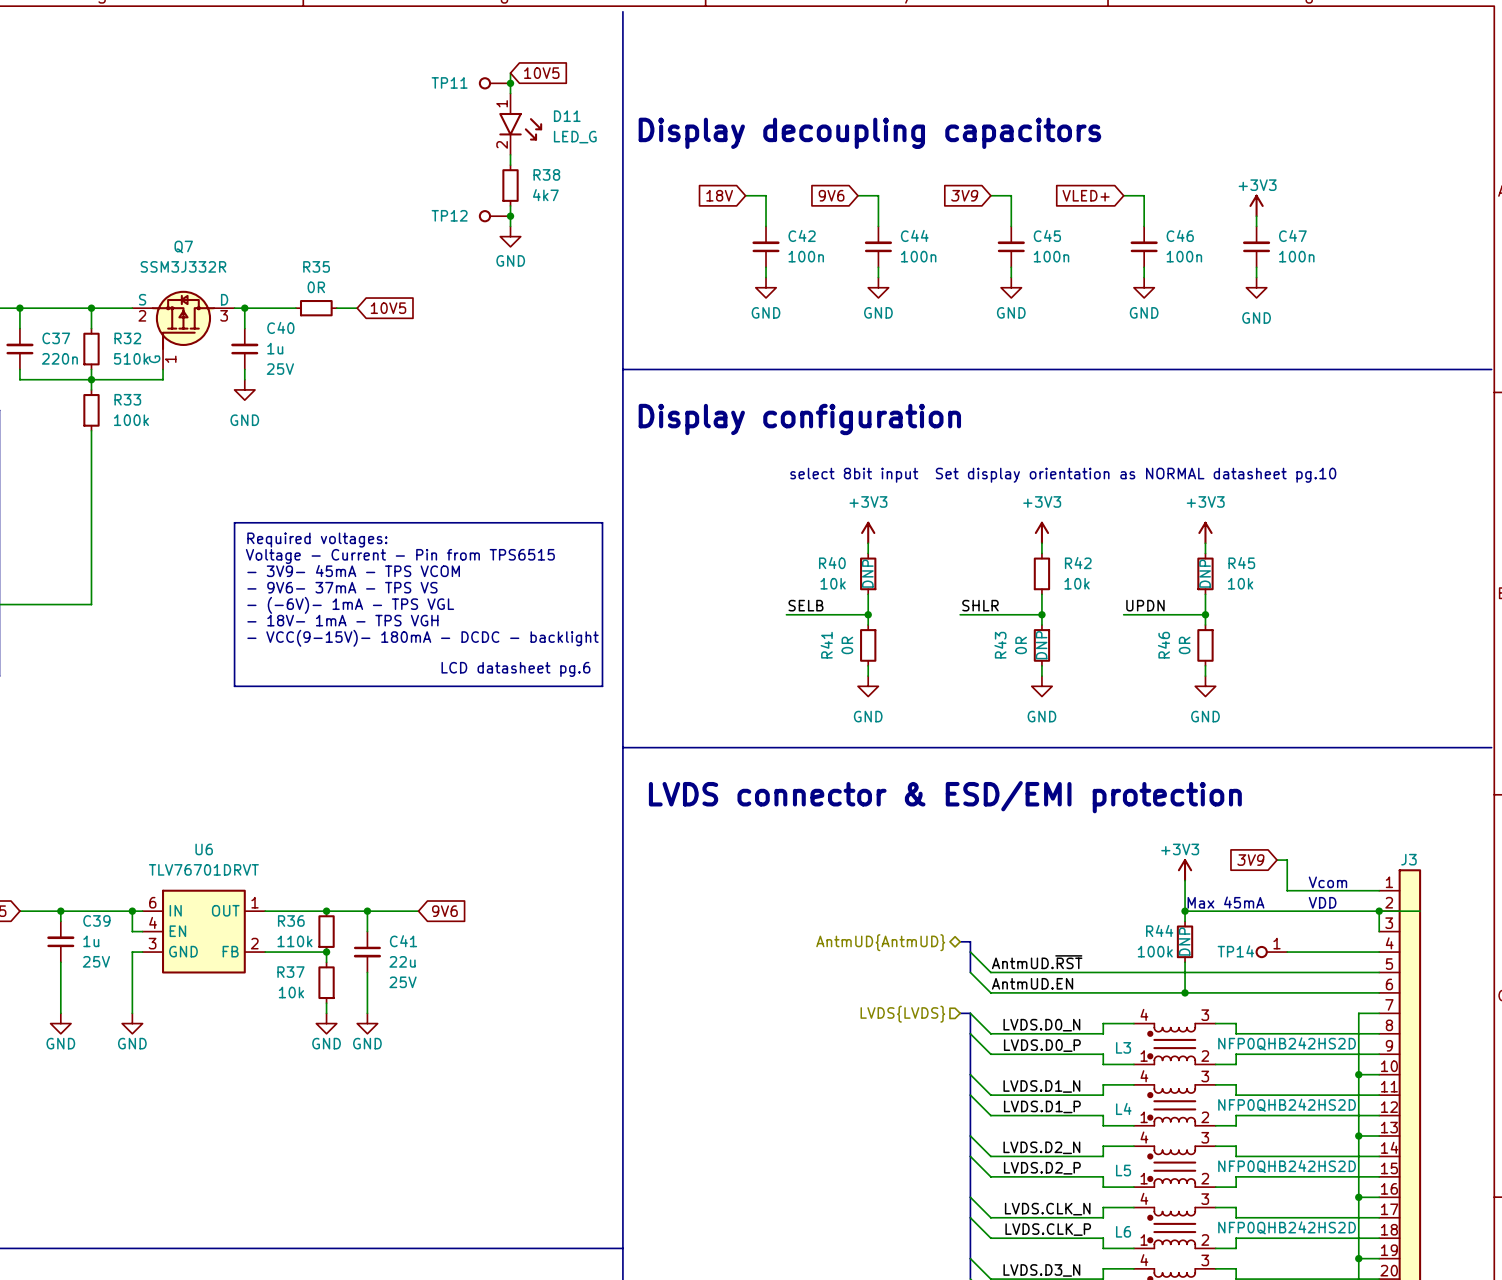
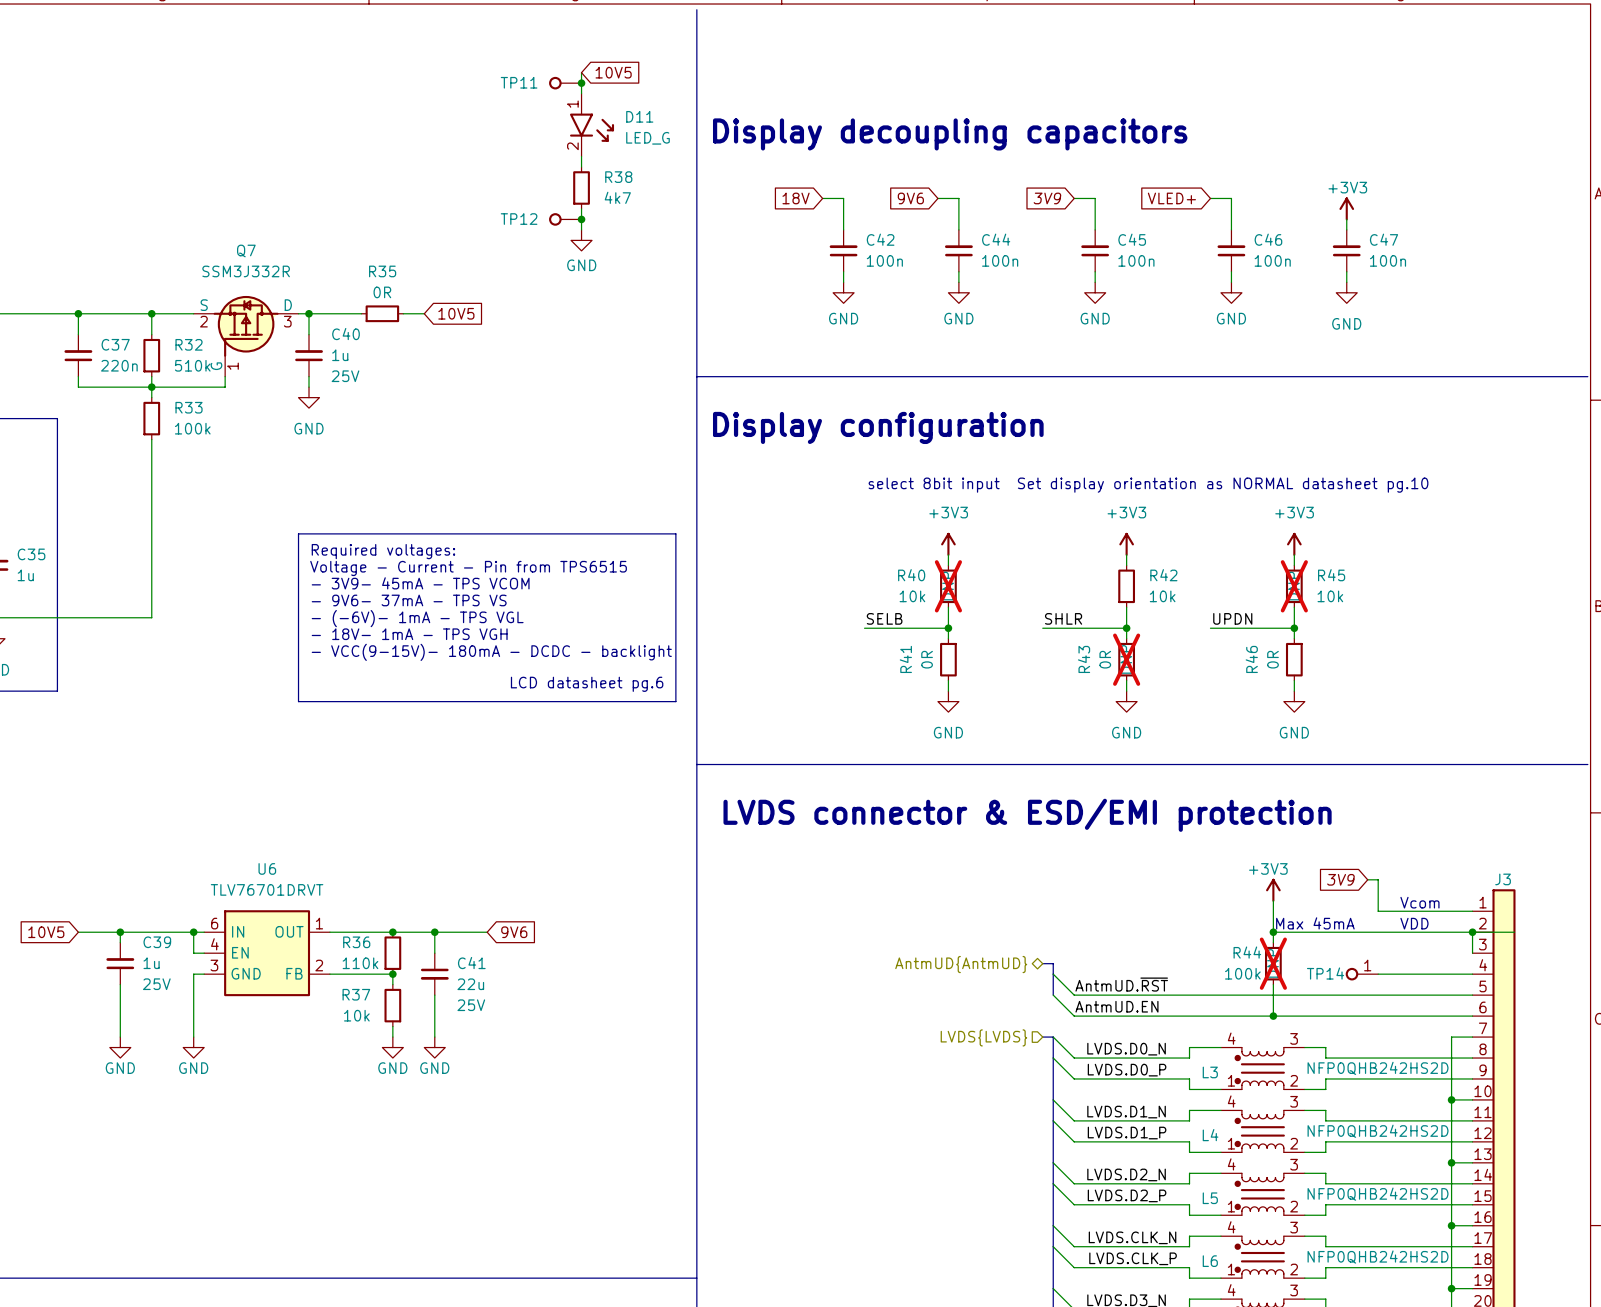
R40 do-not-place cross: none -> (948, 586)
R45 do-not-place cross: none -> (1294, 586)
R43 do-not-place cross: none -> (1126, 659)
R44 do-not-place cross: none -> (1273, 963)

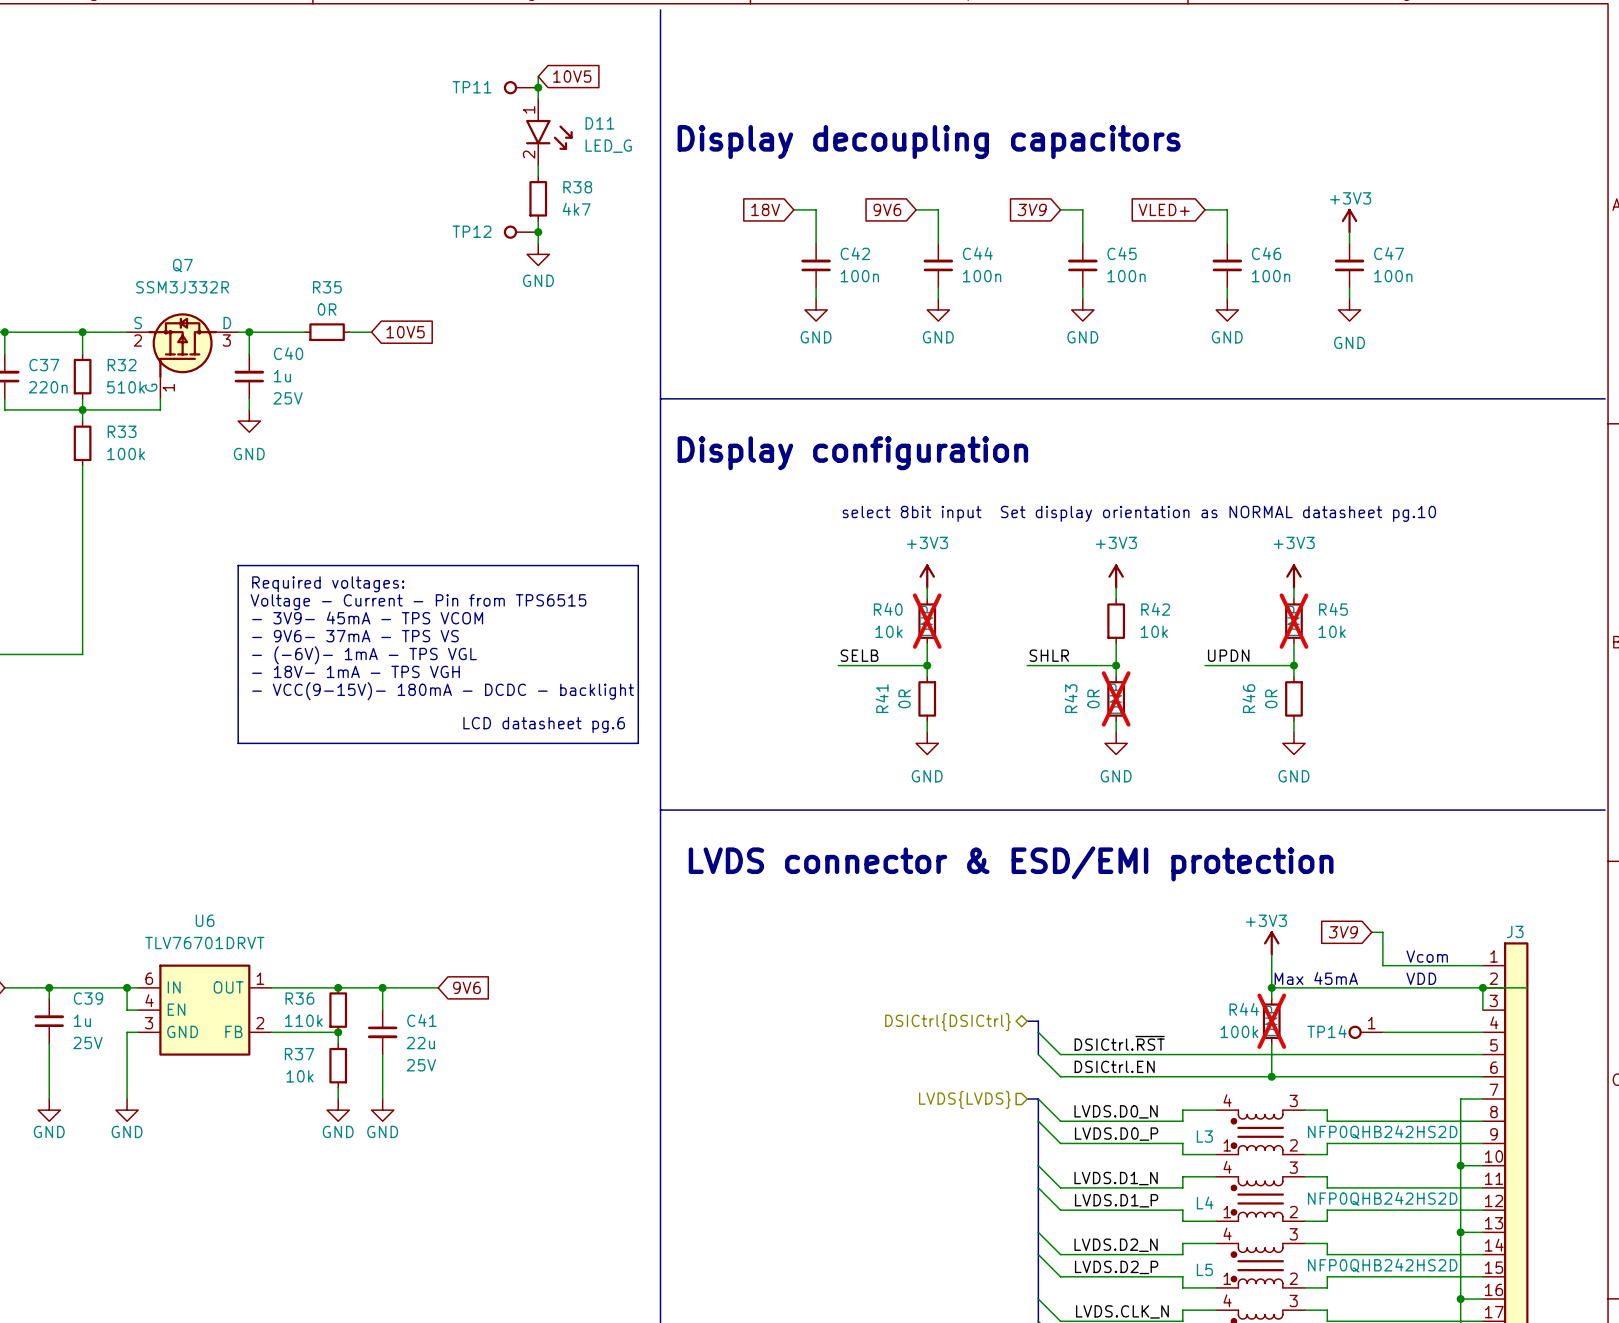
hierarchical label: AntmUD{AntmUD} (961, 964) -> DSICtrl{DSICtrl} (947, 1022)
label: AntmUD.~{RST} (1121, 984) -> none
label: none -> DSICtrl.~{RST} (1119, 1043)
label: AntmUD.EN (1116, 1006) -> none
label: none -> DSICtrl.EN (1114, 1066)

